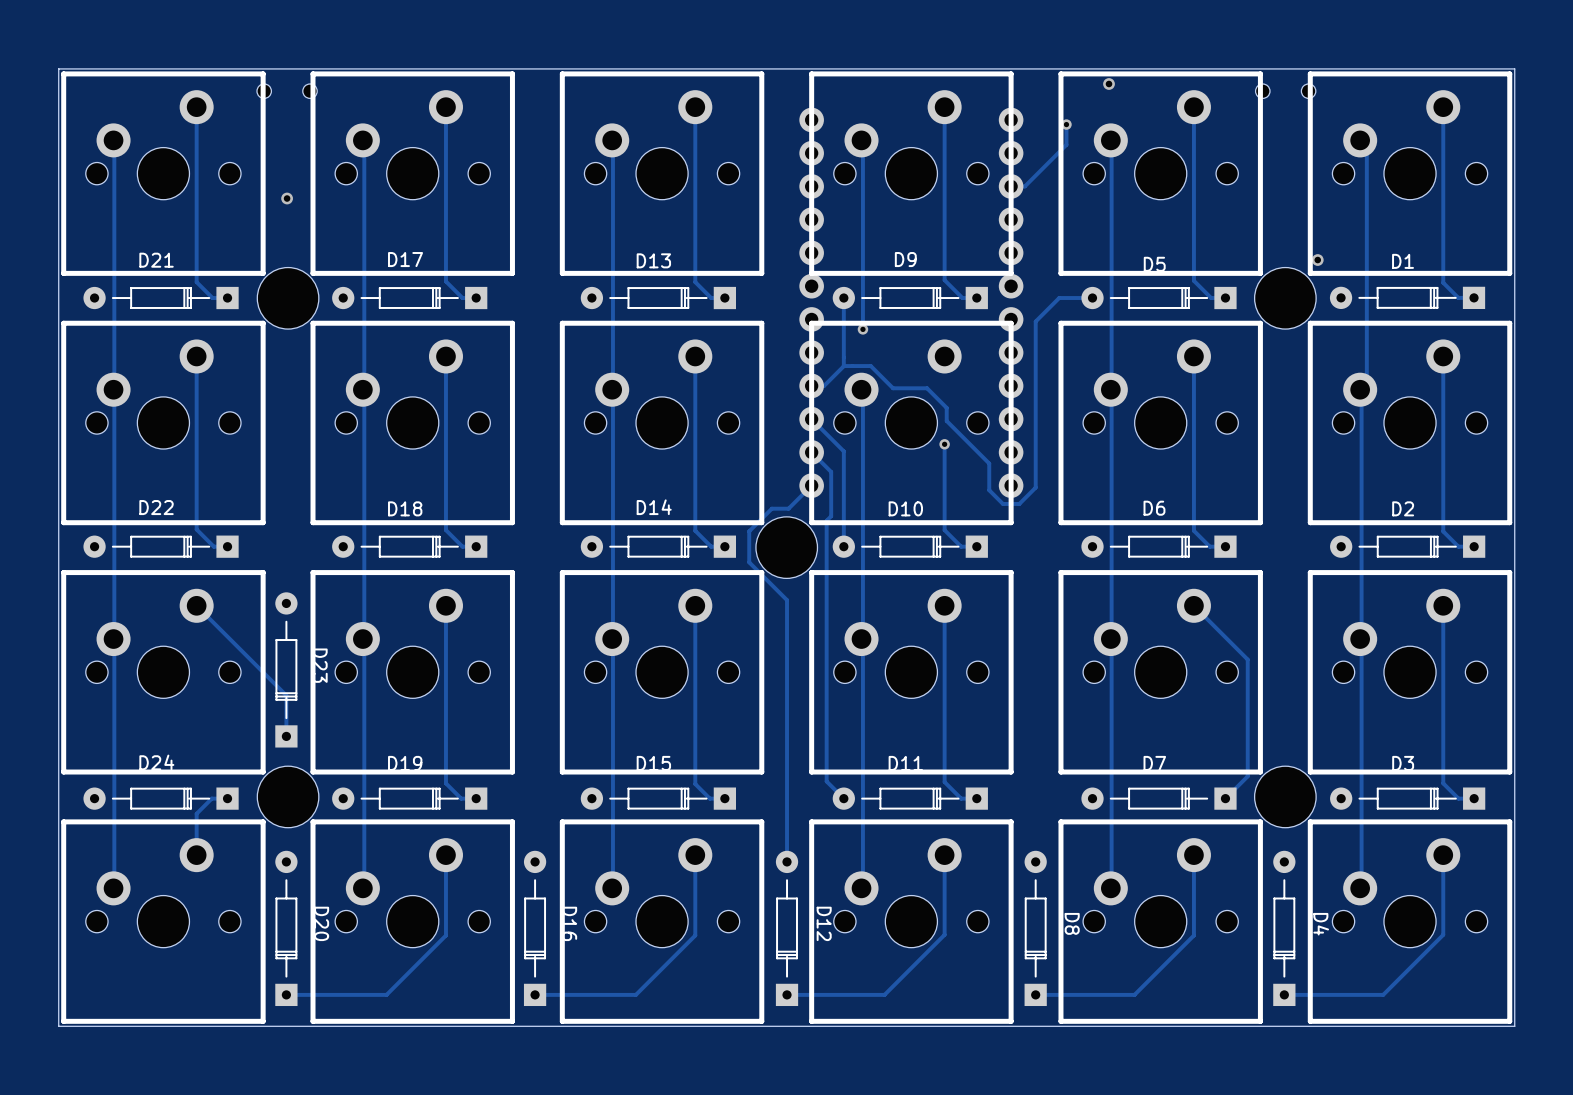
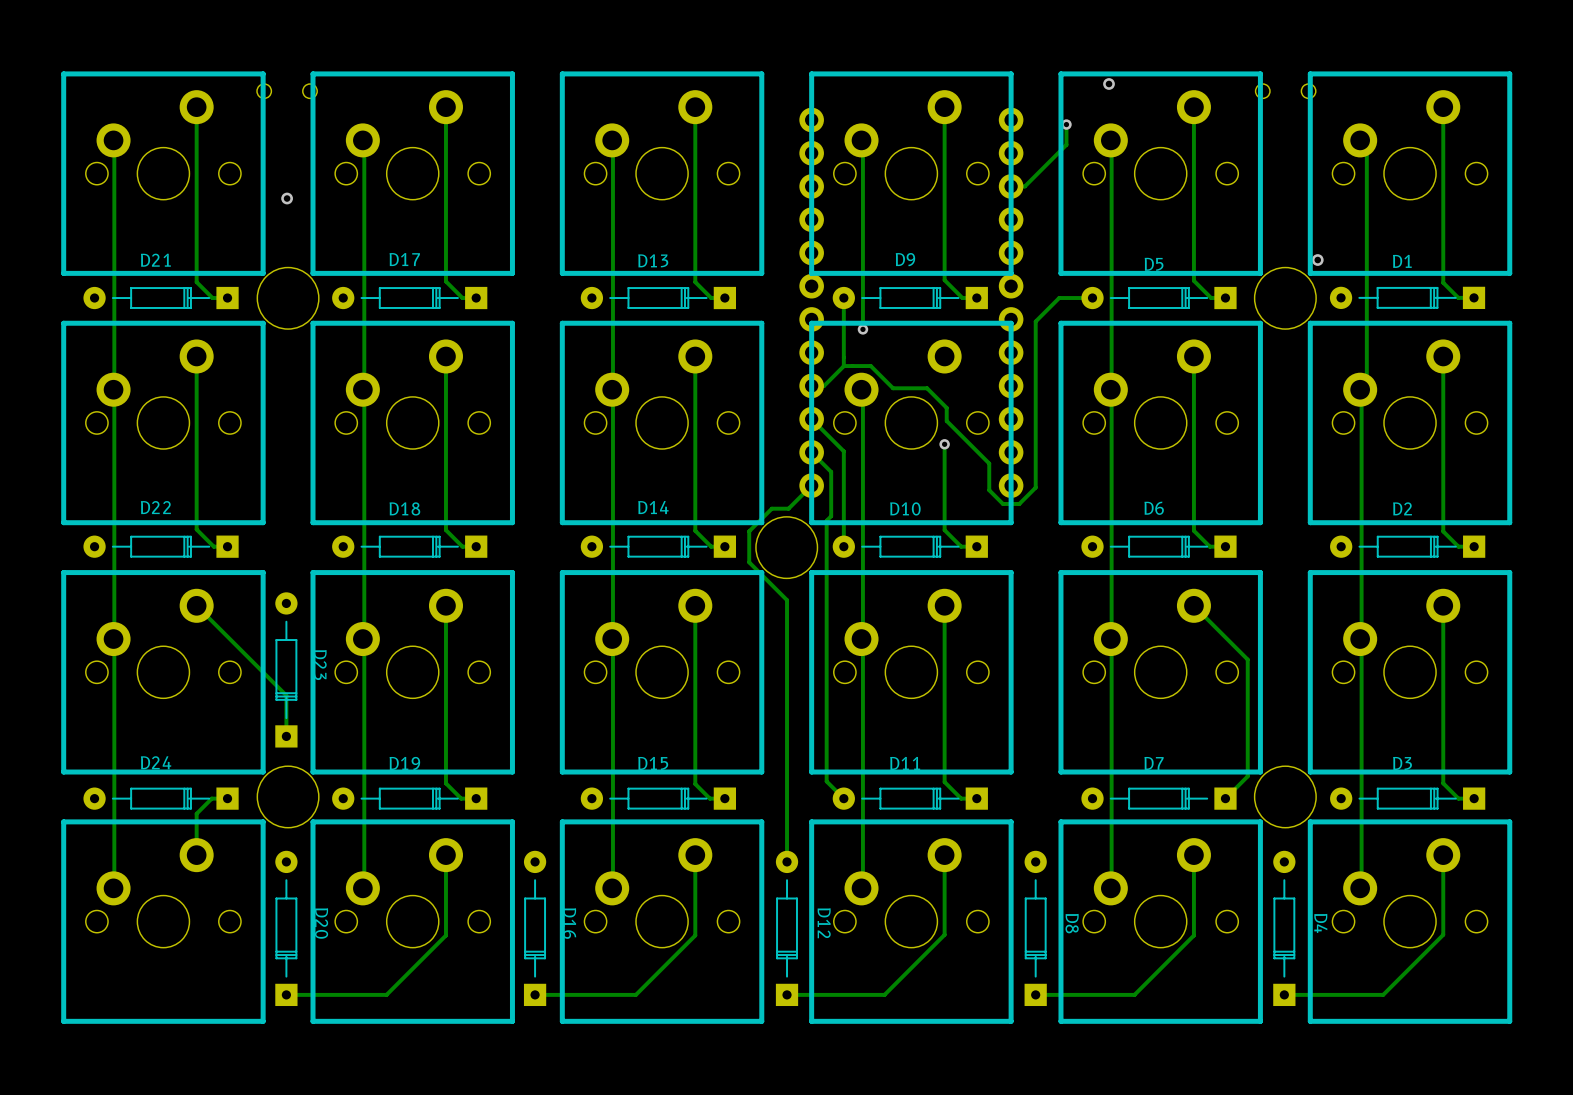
board edge: (1514, 68) (58, 68) (58, 1026) (1514, 1026) (1514, 68) -> none

